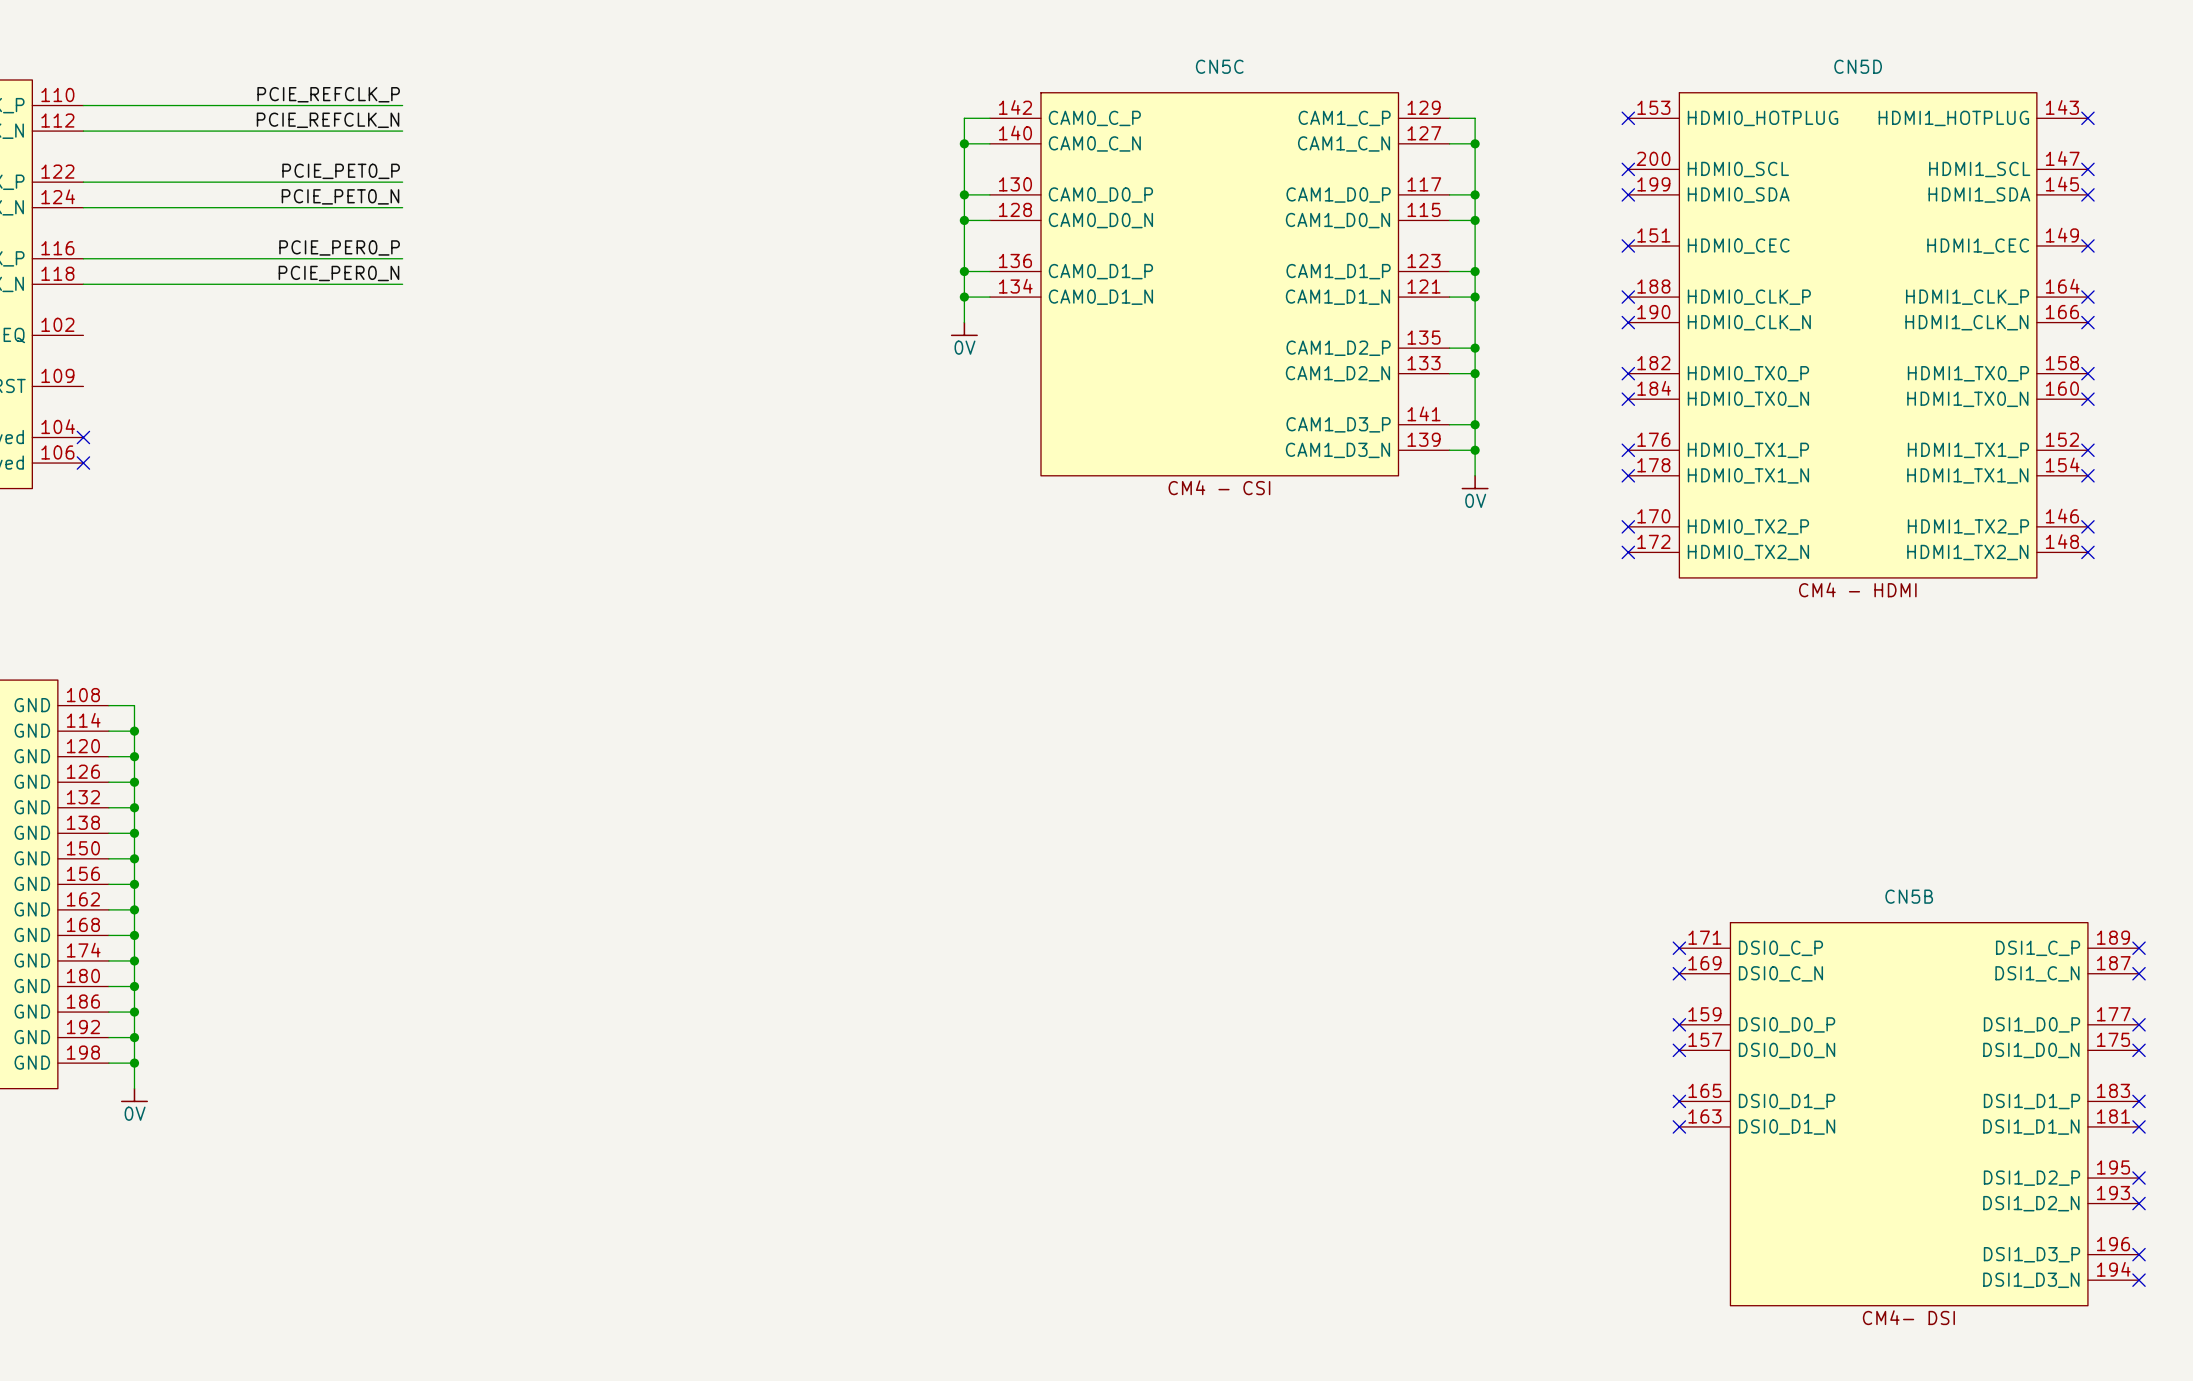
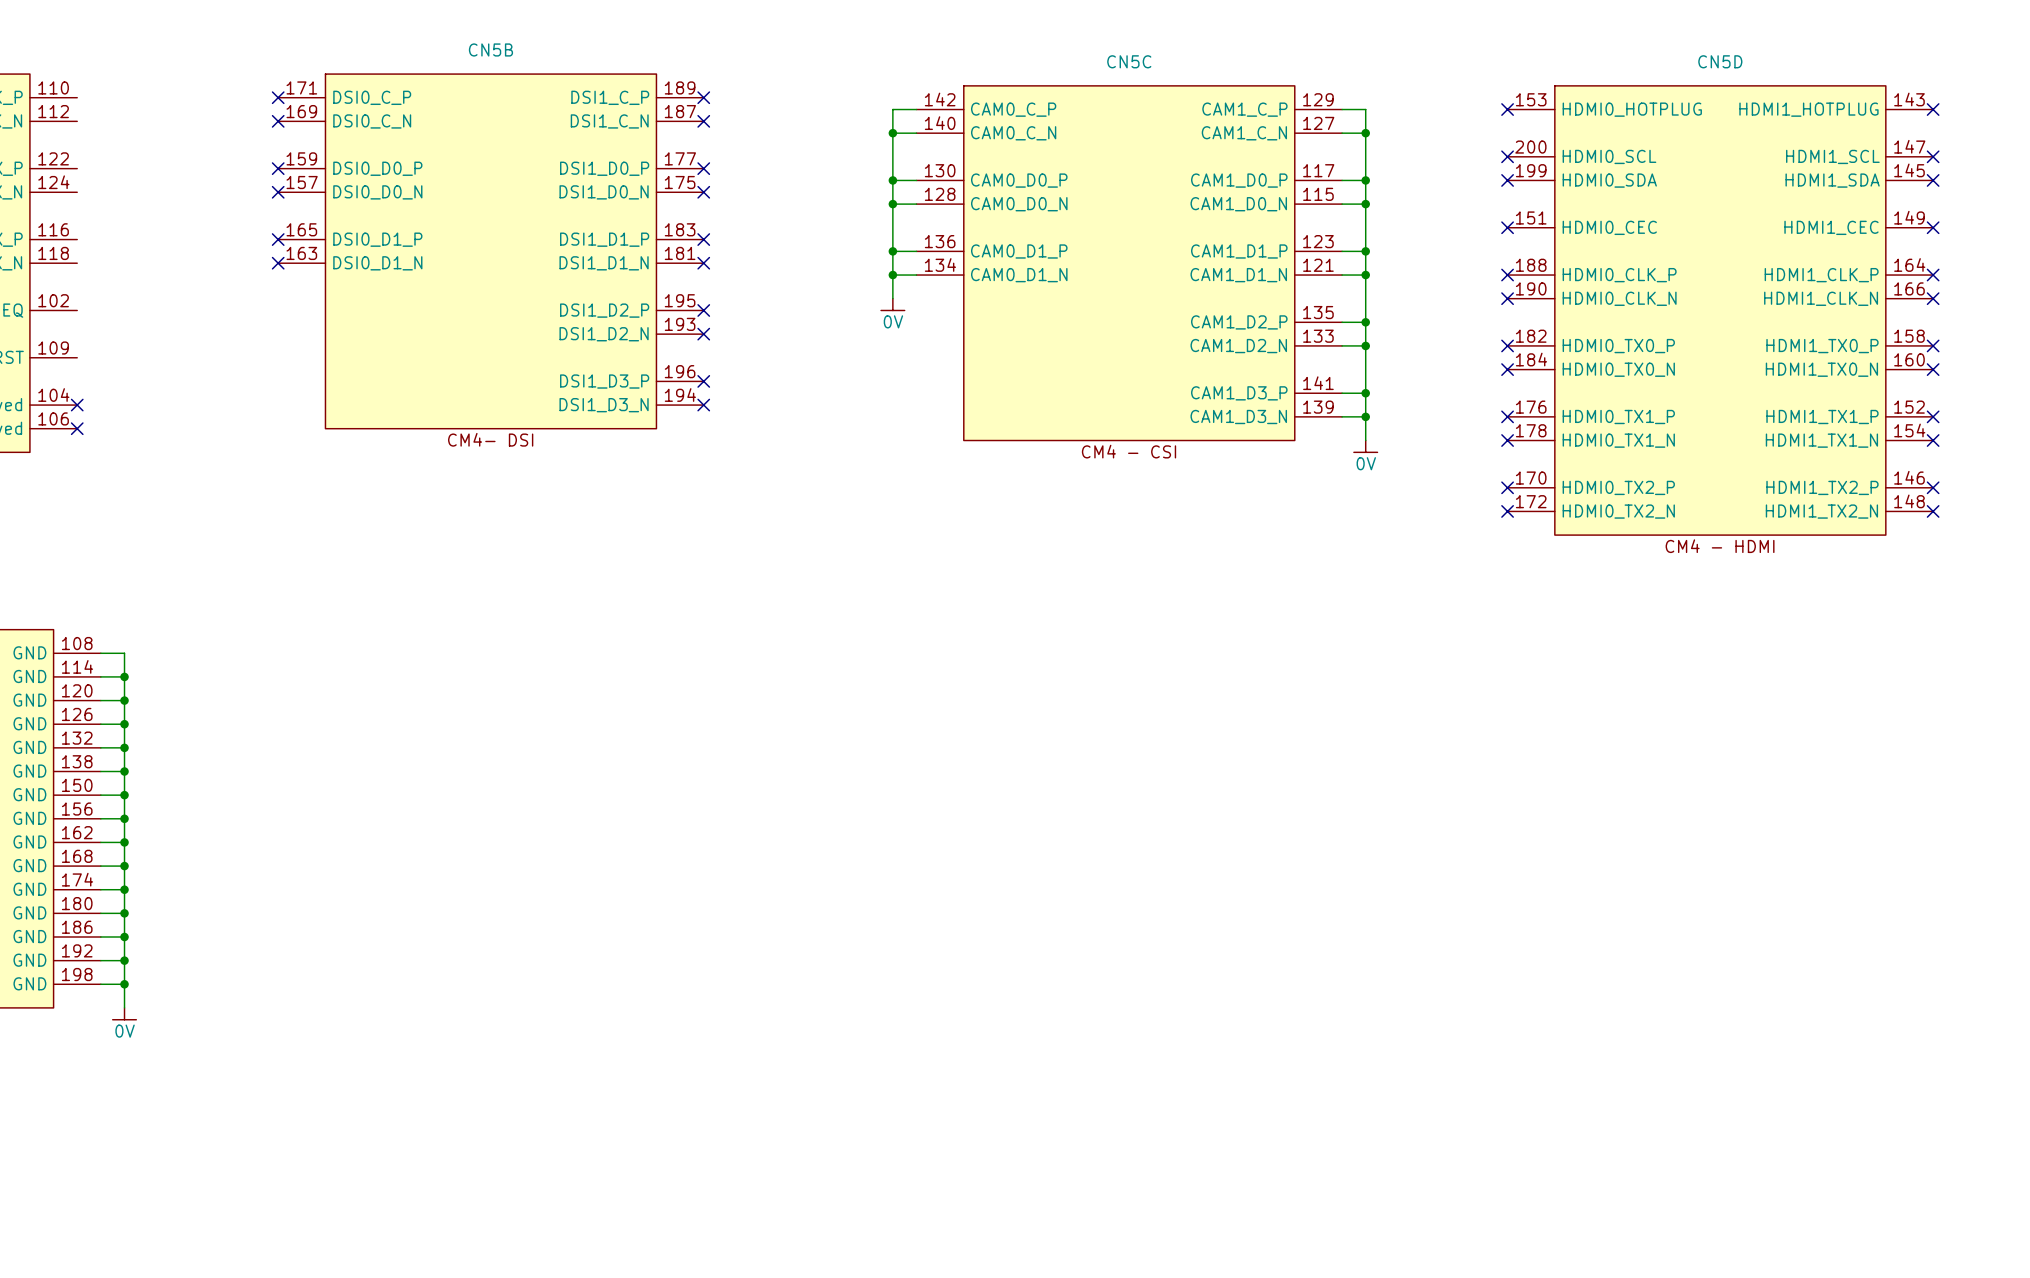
label: PCIE_REFCLK_P (328, 94) -> none
wire: (83, 105) (402, 105) -> none
no-connect mark: none -> (278, 97)
no-connect mark: none -> (703, 97)
label: PCIE_REFCLK_N (328, 120) -> none
wire: (83, 131) (402, 131) -> none
no-connect mark: none -> (278, 121)
no-connect mark: none -> (703, 121)
label: PCIE_PET0_P (341, 171) -> none
wire: (83, 182) (402, 182) -> none
no-connect mark: none -> (278, 168)
no-connect mark: none -> (703, 168)
label: PCIE_PET0_N (340, 196) -> none
wire: (83, 207) (402, 207) -> none
no-connect mark: none -> (278, 192)
no-connect mark: none -> (703, 192)
label: PCIE_PER0_P (339, 247) -> none
wire: (83, 258) (402, 258) -> none
no-connect mark: none -> (278, 239)
no-connect mark: none -> (703, 239)
label: PCIE_PER0_N (338, 273) -> none
wire: (83, 284) (402, 284) -> none
no-connect mark: none -> (278, 263)
no-connect mark: none -> (703, 263)
no-connect mark: none -> (703, 310)
no-connect mark: none -> (703, 334)
no-connect mark: none -> (703, 381)
no-connect mark: none -> (703, 405)
no-connect mark: (1679, 948) -> none
no-connect mark: (2139, 948) -> none
no-connect mark: (1679, 973) -> none
no-connect mark: (2139, 973) -> none
no-connect mark: (1679, 1024) -> none
no-connect mark: (2139, 1024) -> none
no-connect mark: (1679, 1050) -> none
no-connect mark: (2139, 1050) -> none
no-connect mark: (1679, 1101) -> none
no-connect mark: (2139, 1101) -> none
CN5B position: (1909, 1114) -> (490, 251)
no-connect mark: (1679, 1126) -> none
no-connect mark: (2139, 1126) -> none
no-connect mark: (2139, 1178) -> none
no-connect mark: (2139, 1203) -> none
no-connect mark: (2139, 1254) -> none
no-connect mark: (2139, 1280) -> none

